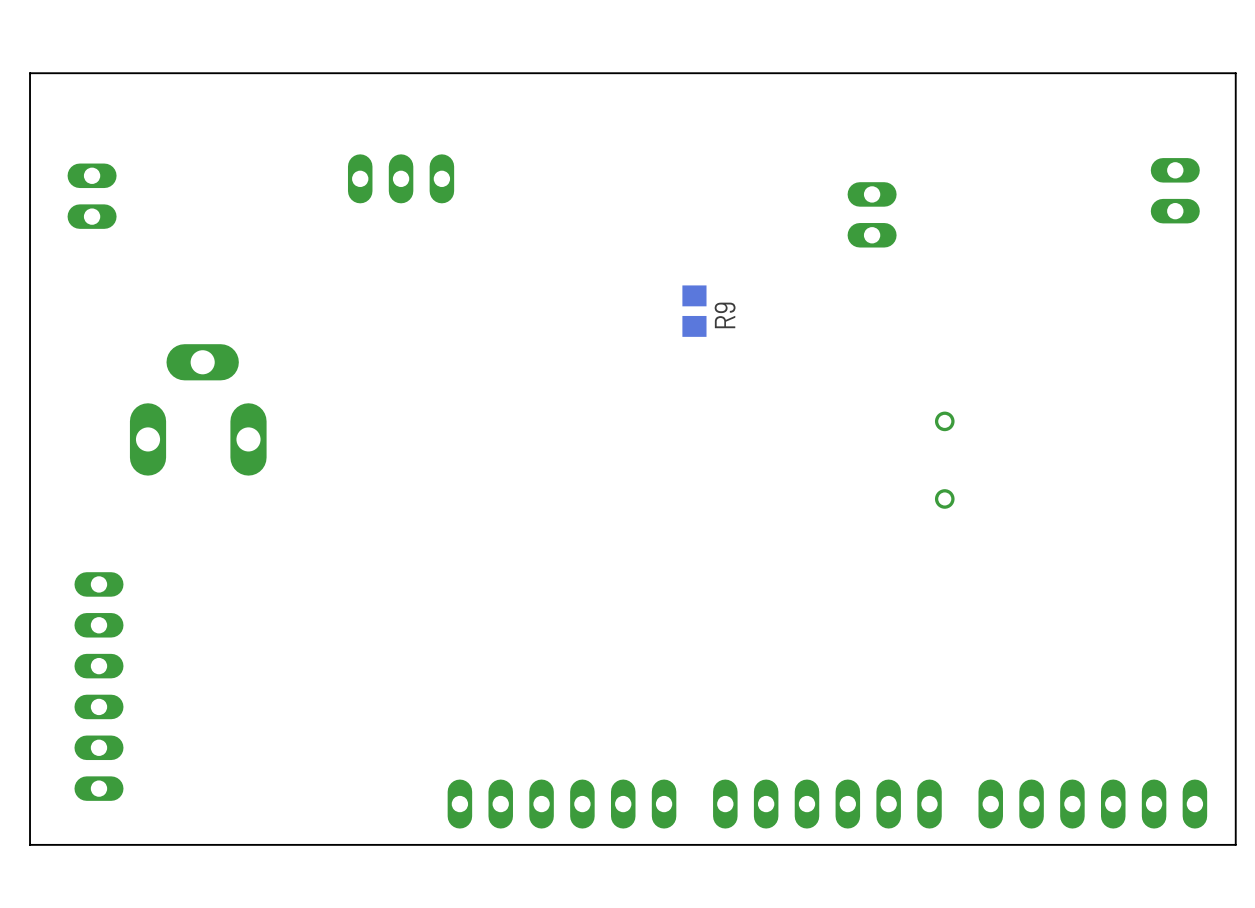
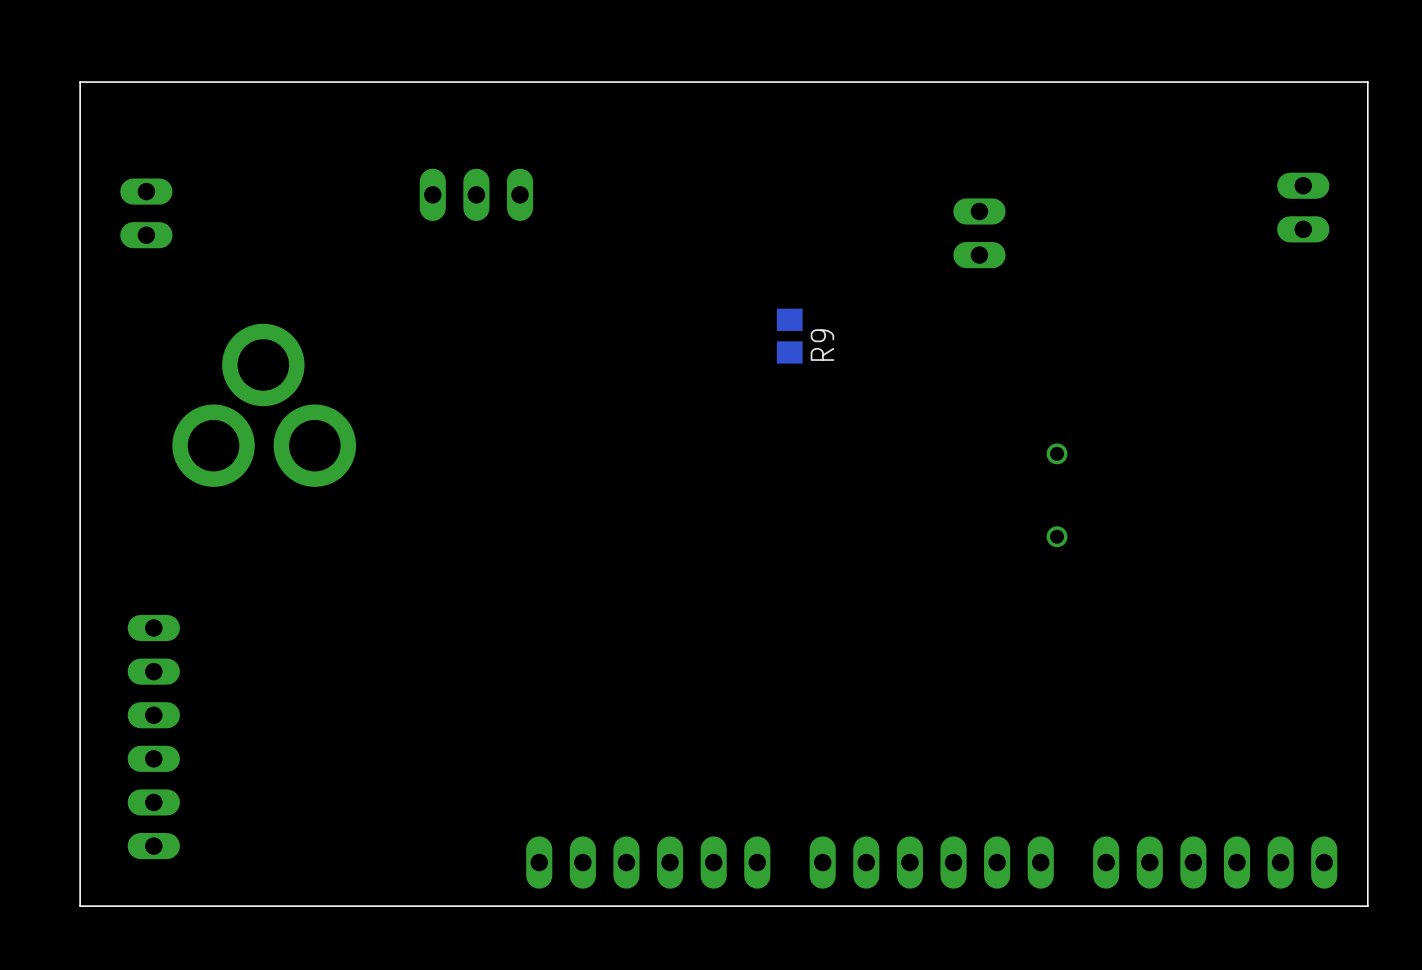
part: none -> (264, 405)
part: (198, 409) -> none

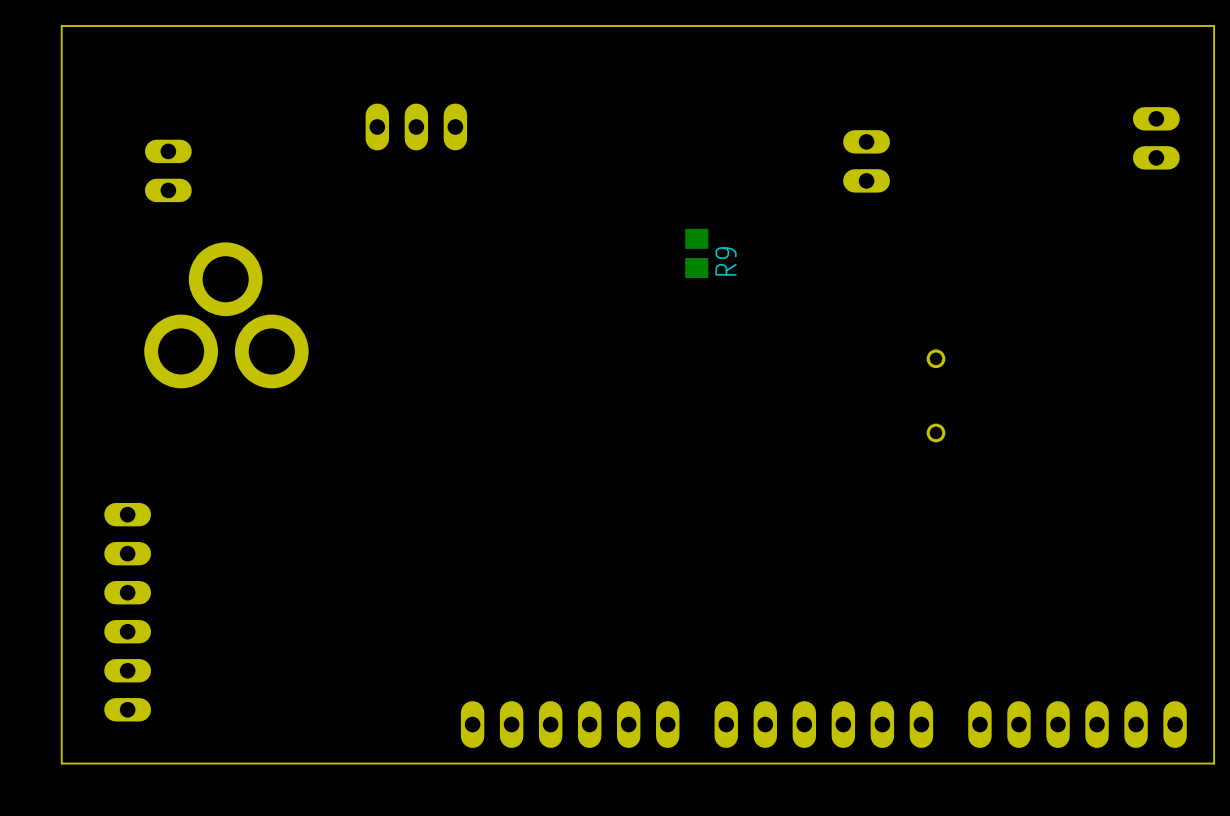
part position: (146, 213) -> (168, 170)

